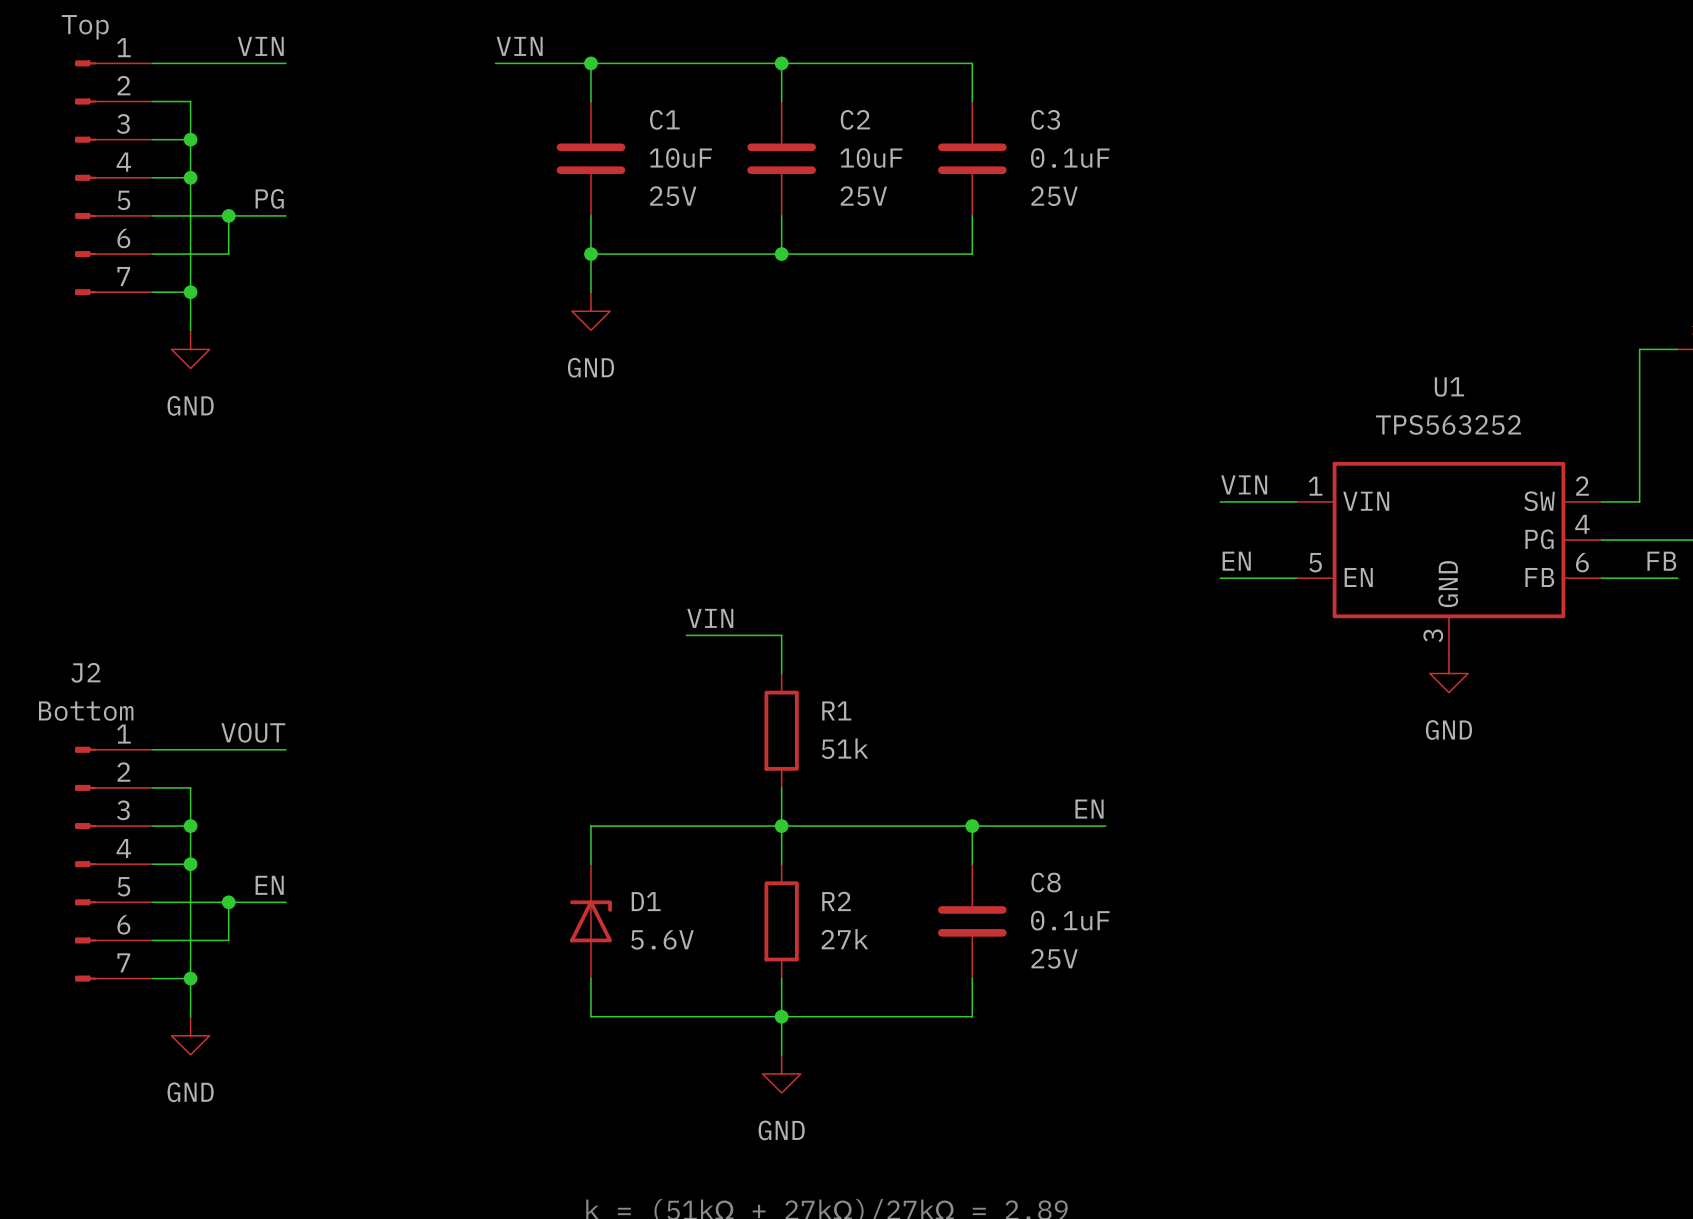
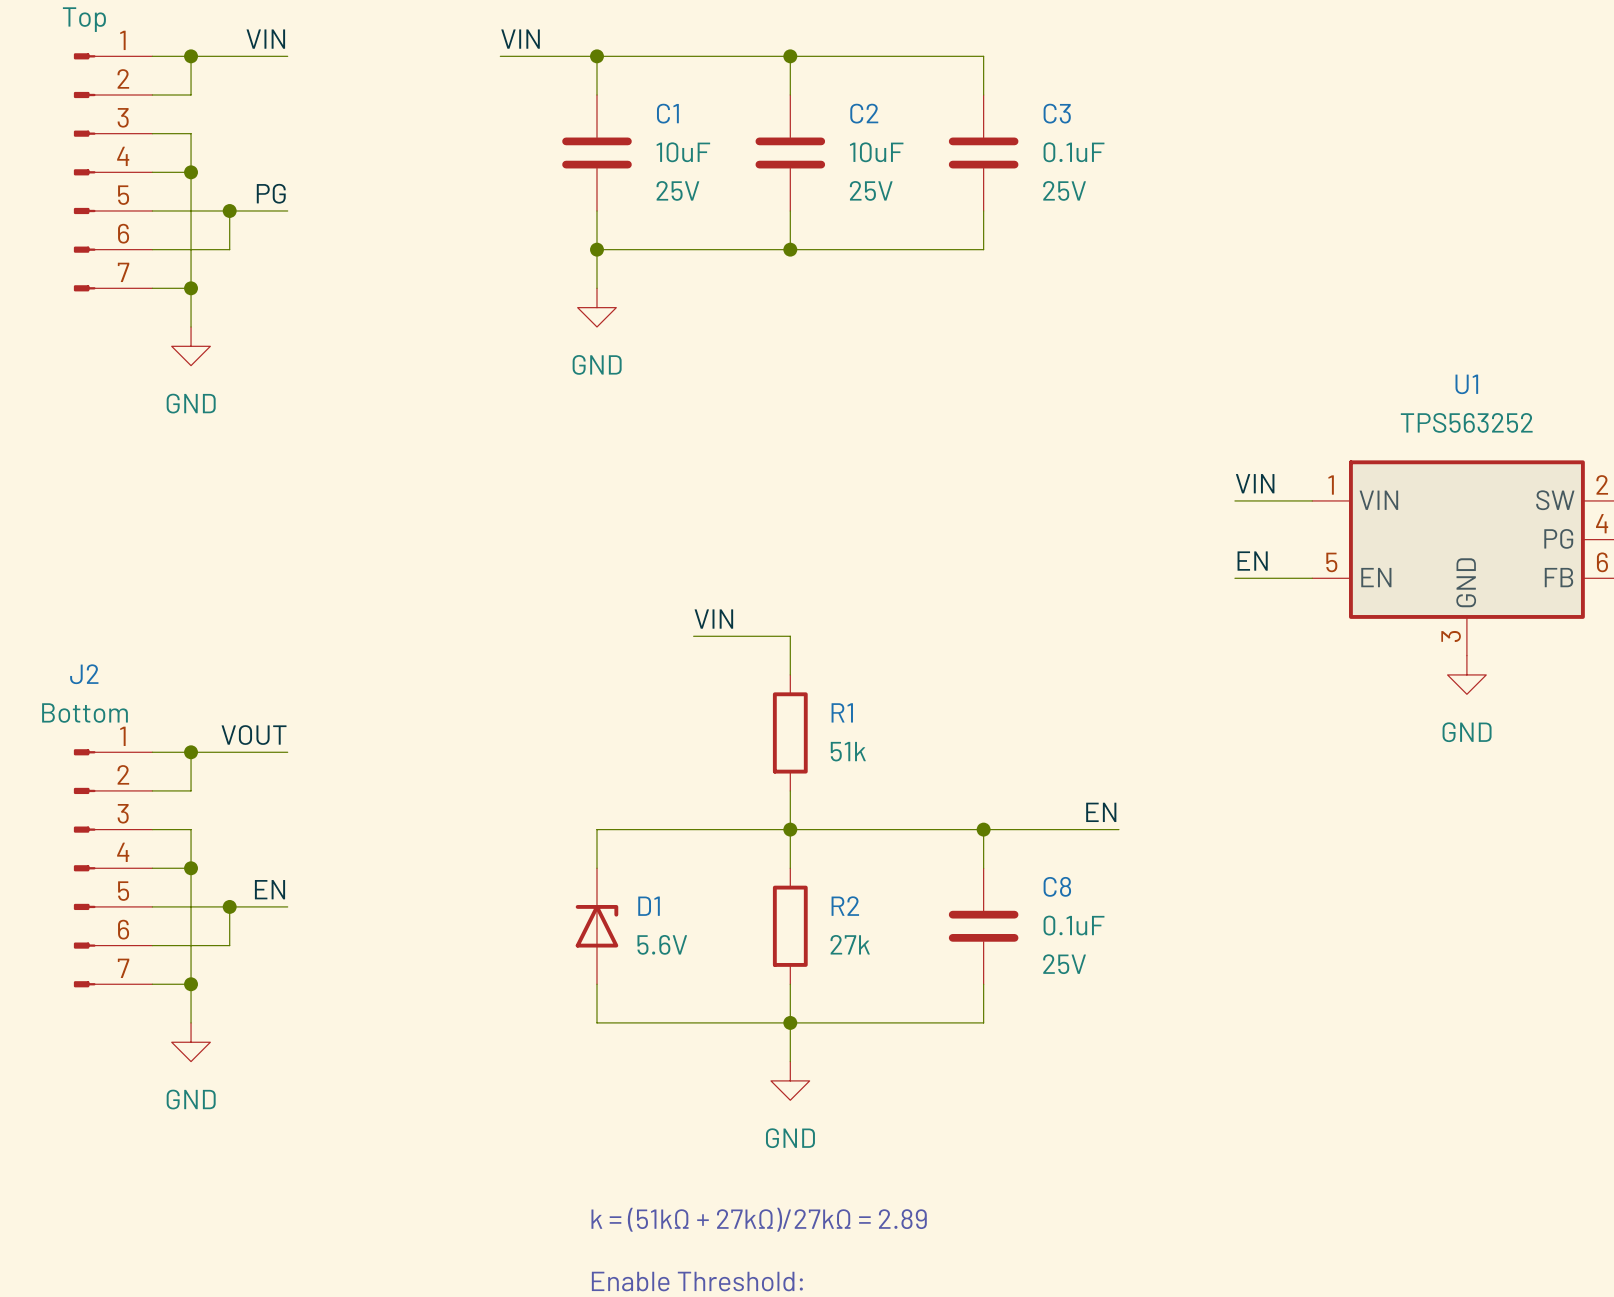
wire: (190, 101) (190, 139) -> (191, 95) (191, 56)
junction position: (190, 139) -> (191, 56)
wire: (190, 787) (190, 826) -> (191, 790) (191, 752)
junction position: (190, 826) -> (191, 752)

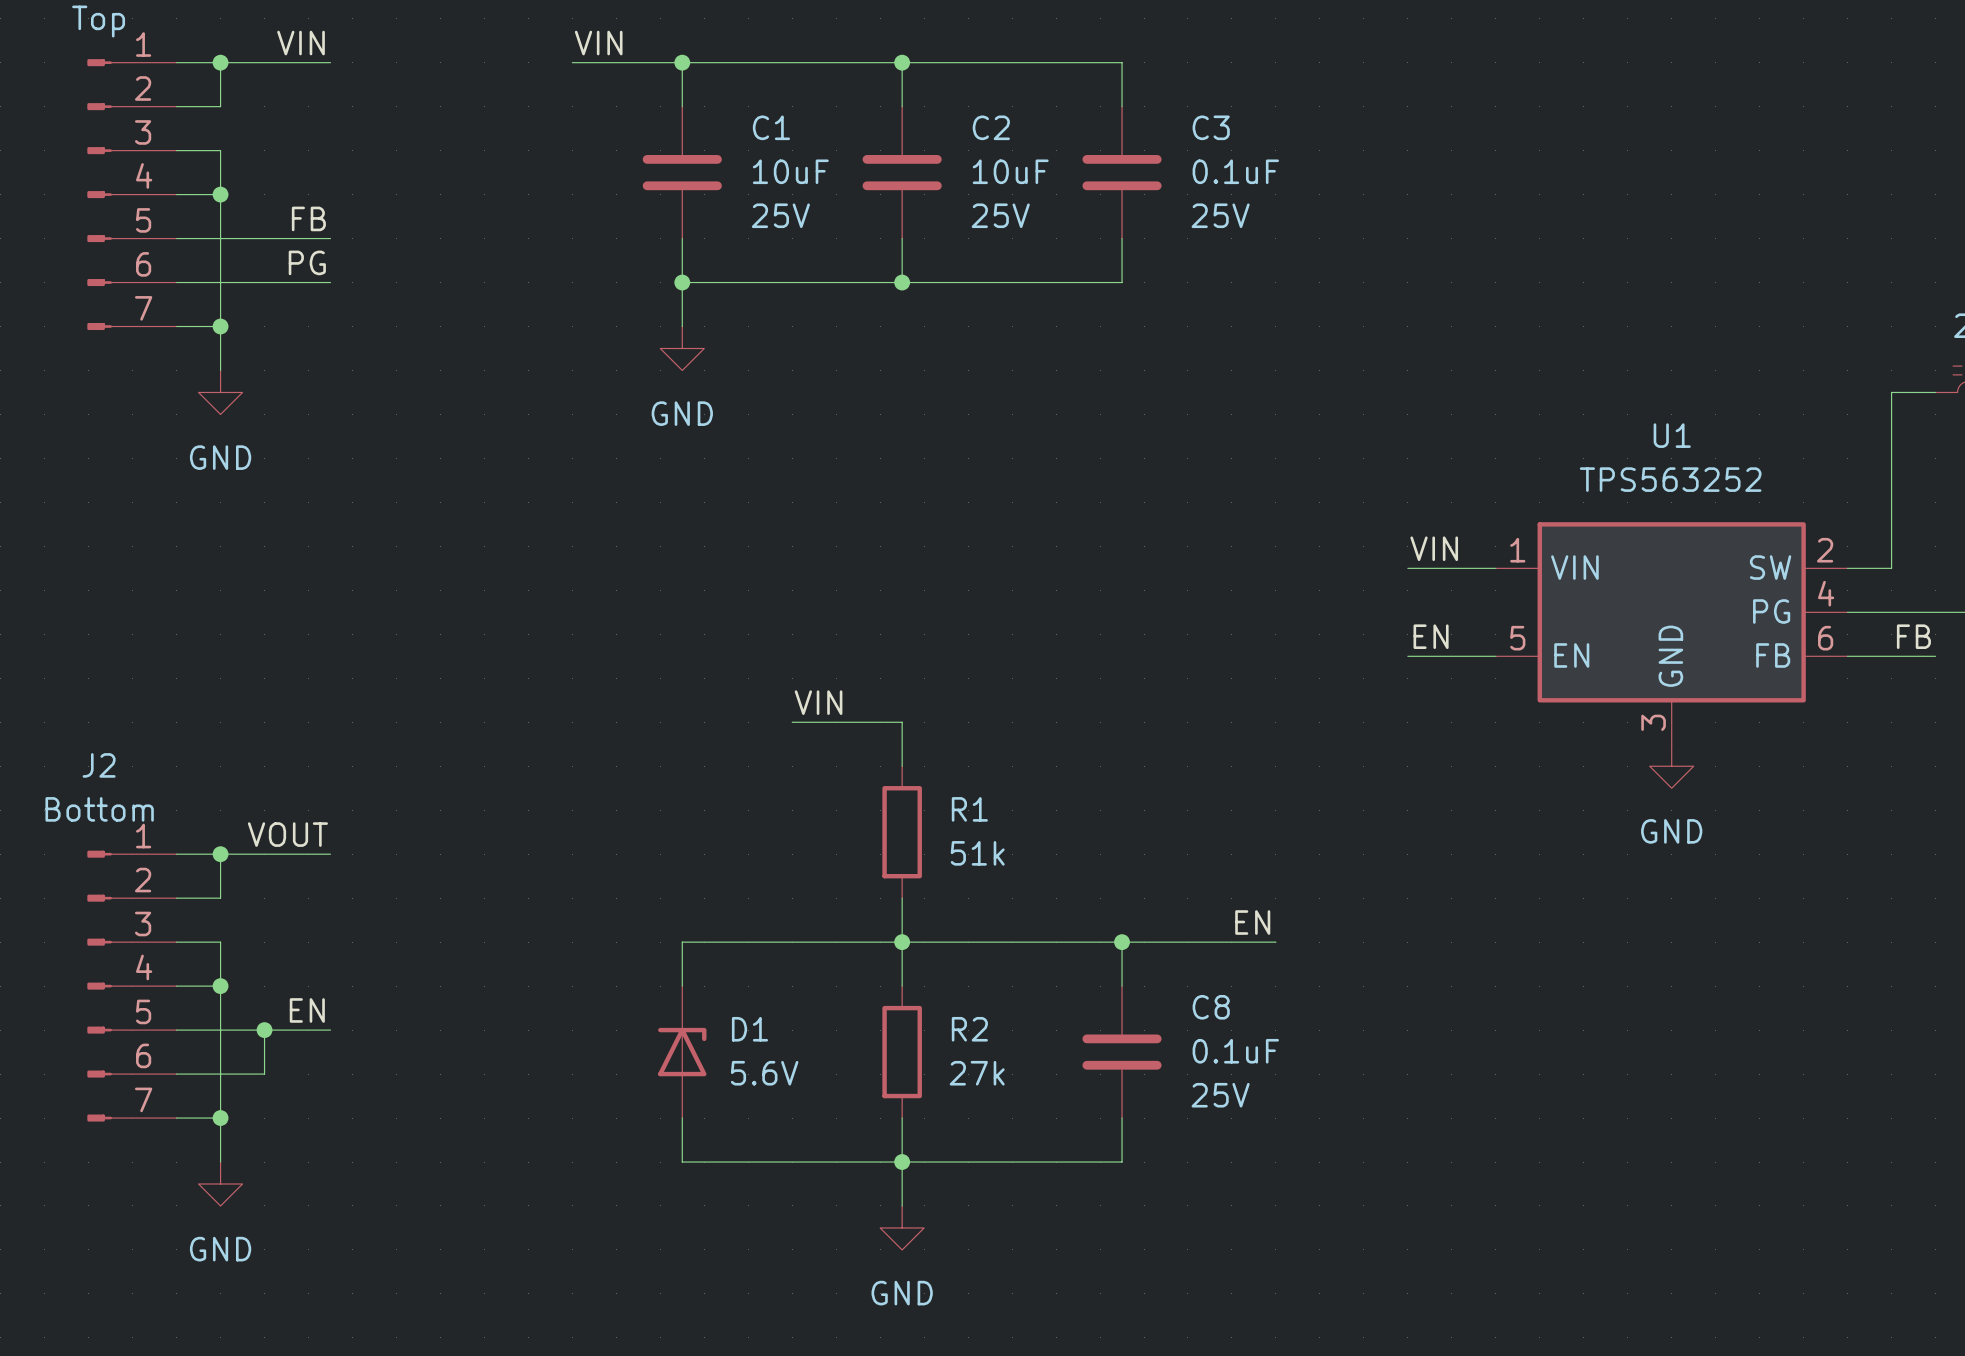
label: PG (271, 193) -> FB (308, 218)
wire: (229, 210) (229, 249) -> (330, 282) (264, 282)
junction: (229, 210) -> none
label: none -> PG (307, 262)

